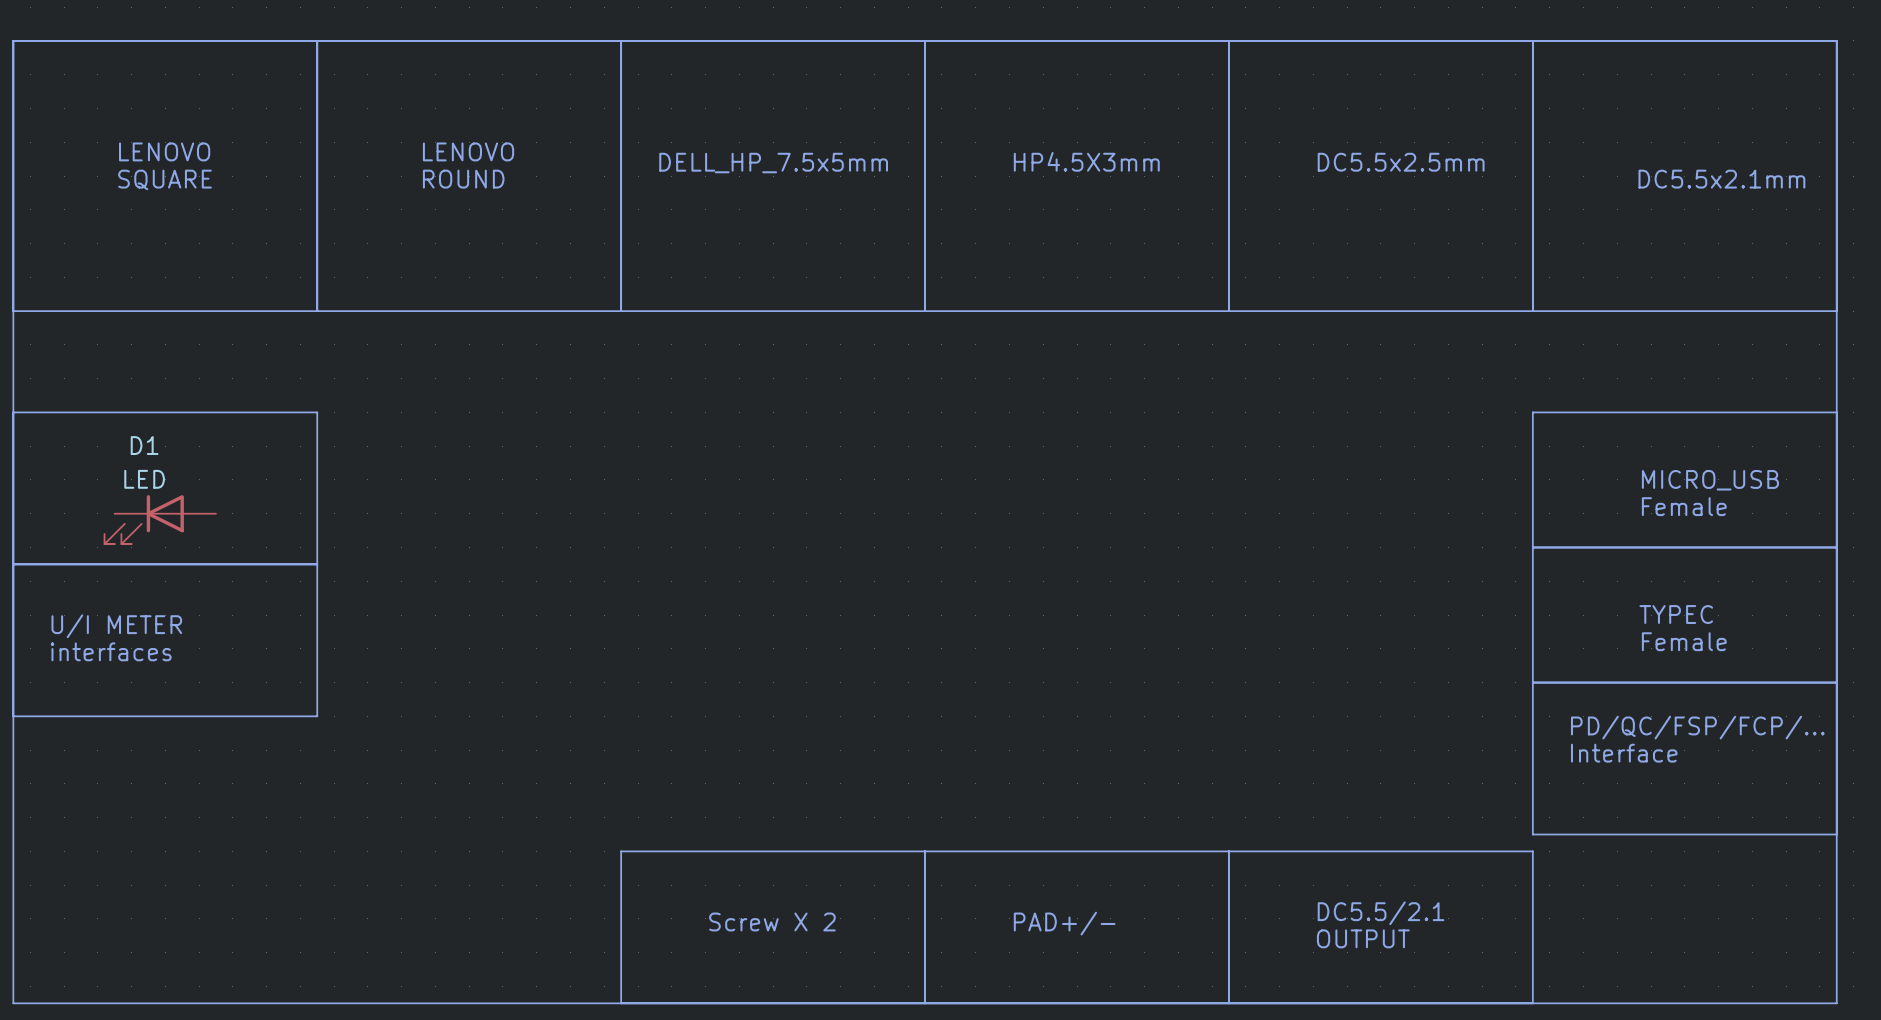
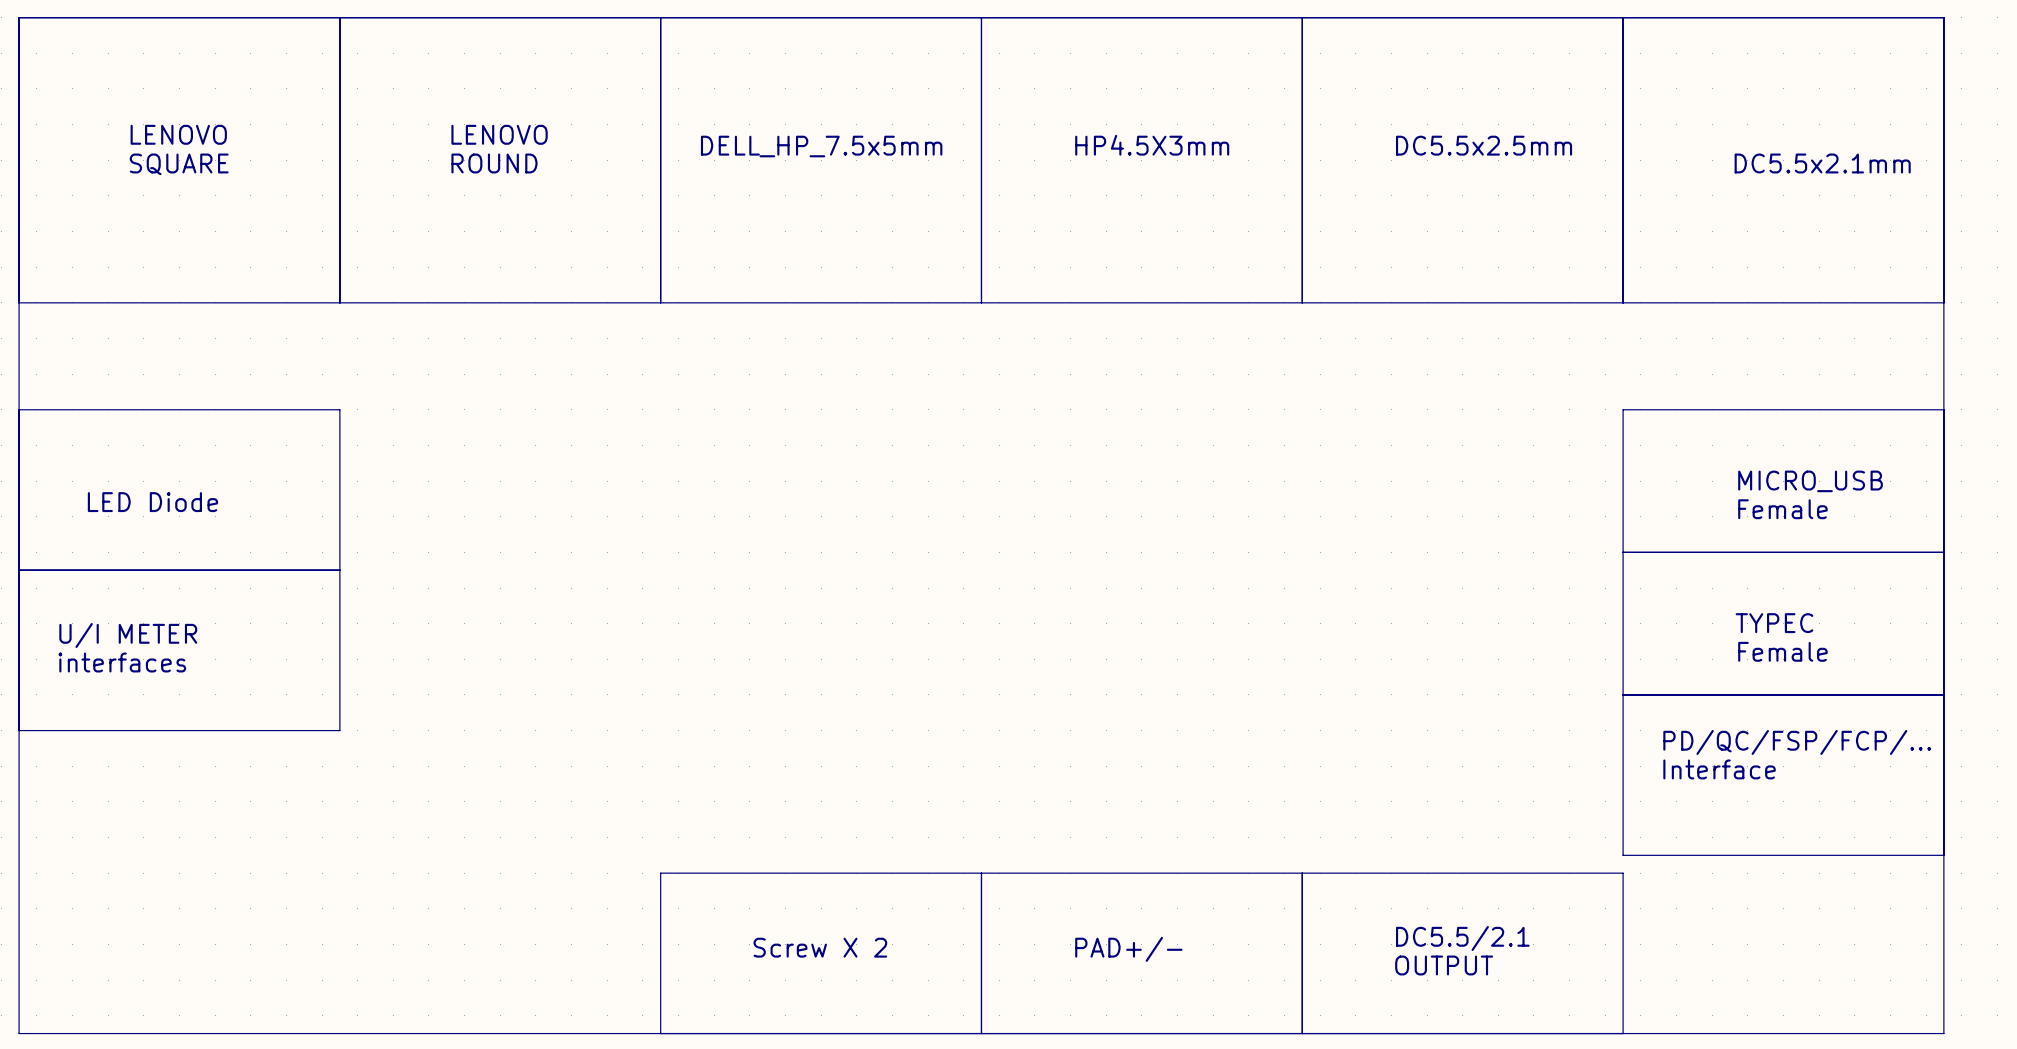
text: none -> LED Diode (152, 502)
D1: LED (160, 519) -> none

